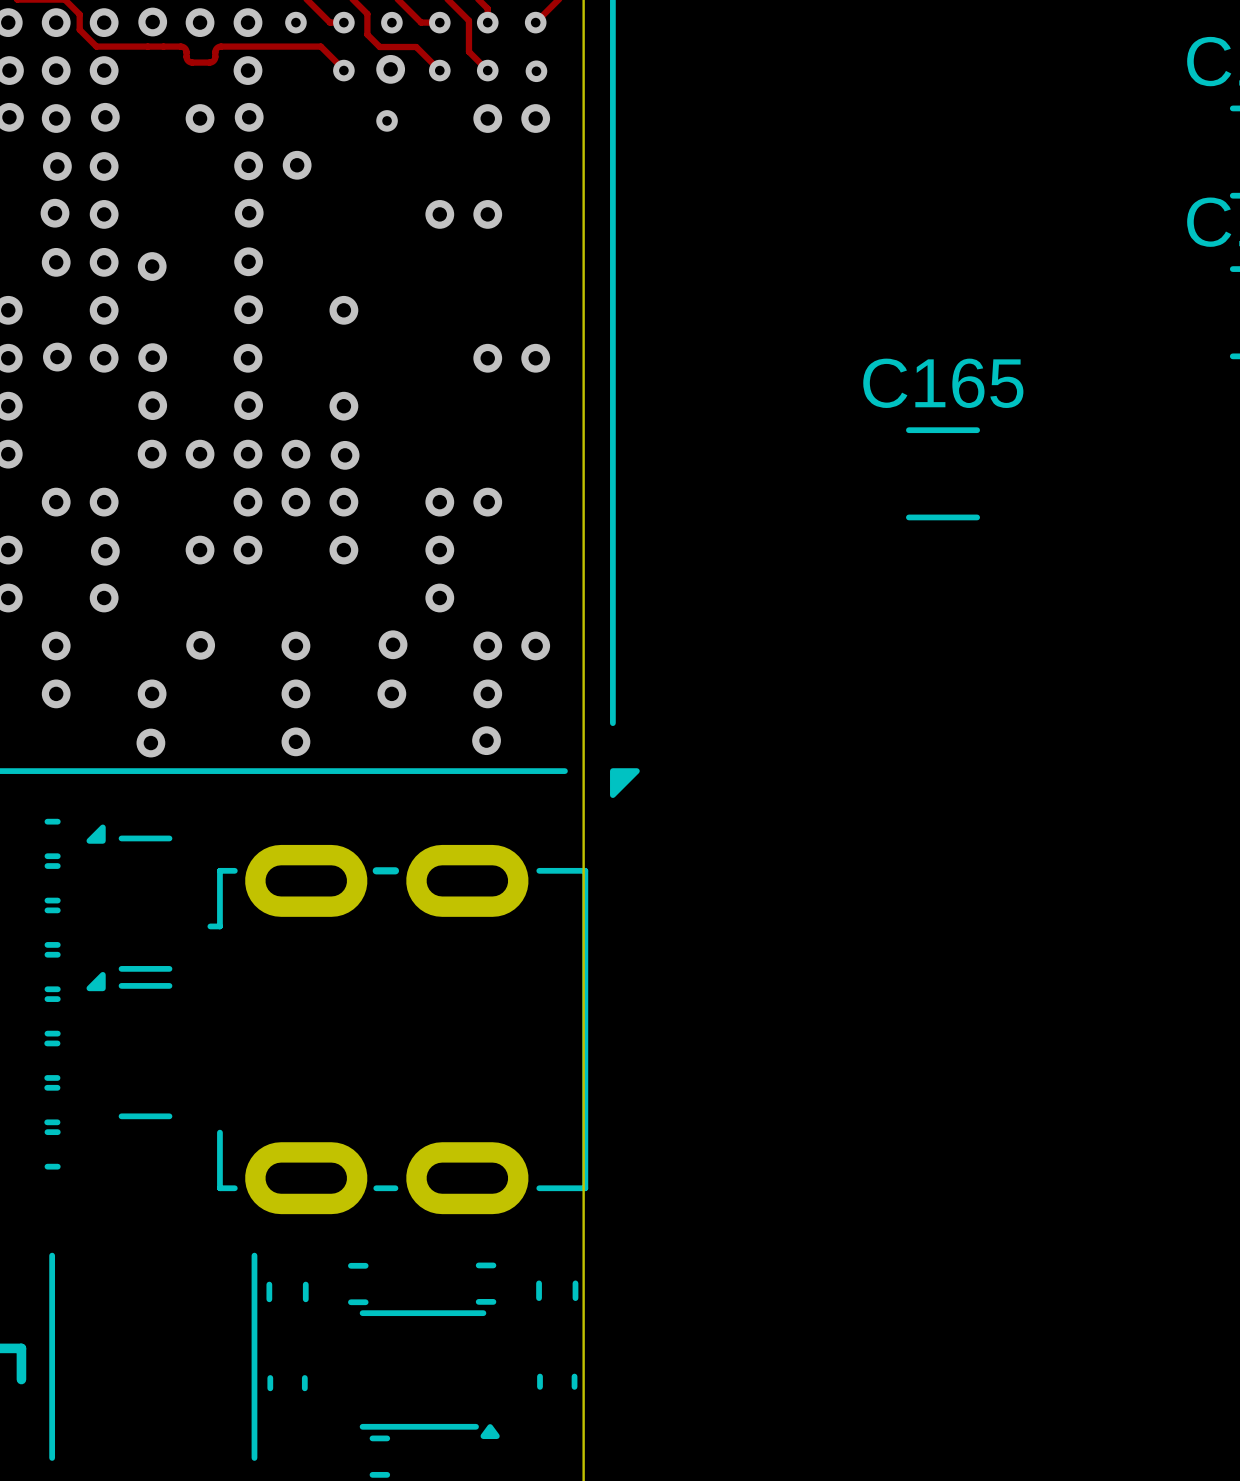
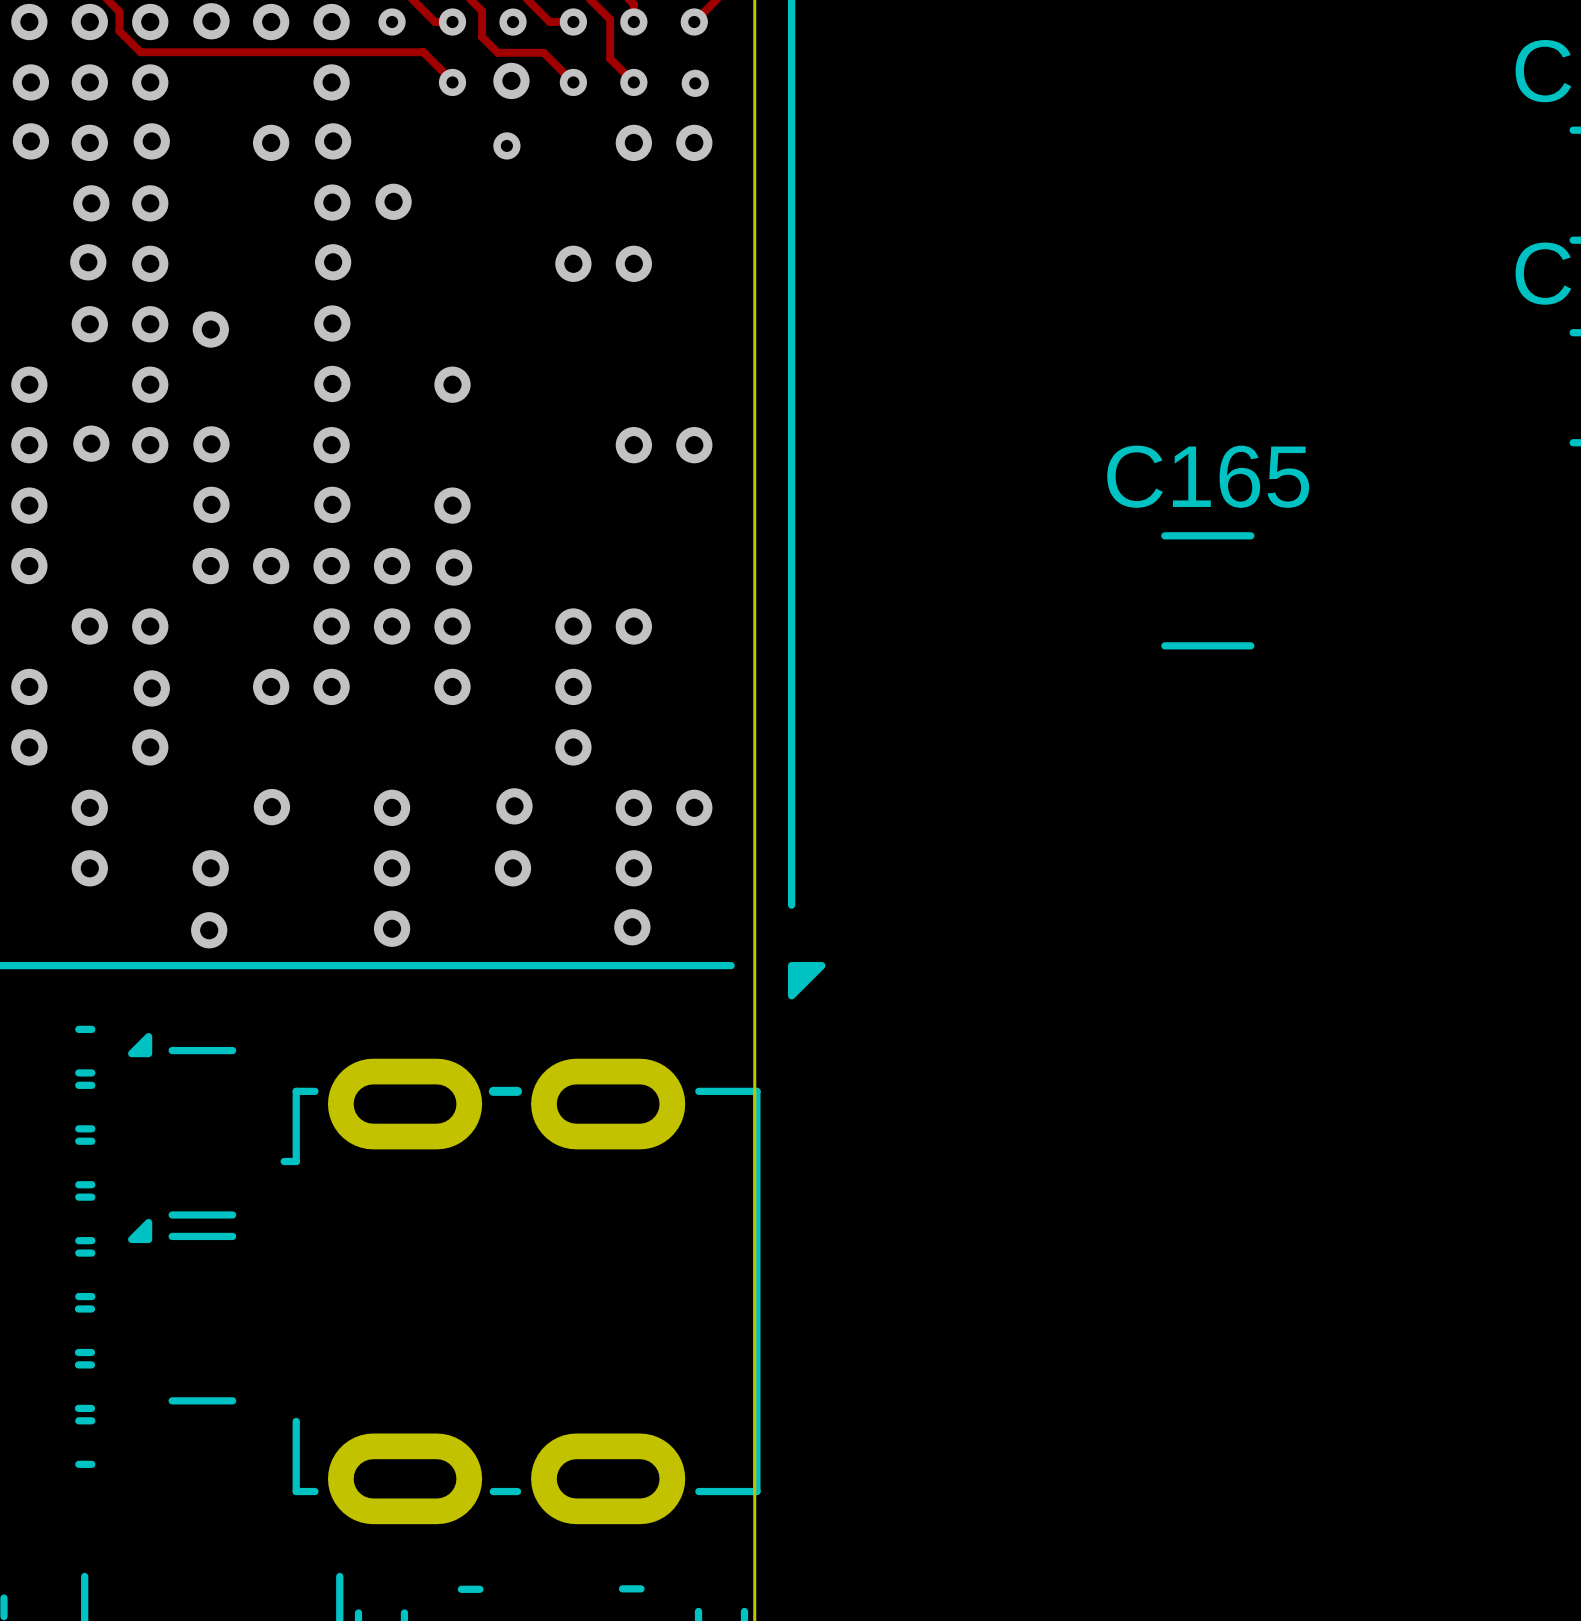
track: (180, 46) (185, 48) (187, 59) (192, 62) (212, 61) (216, 49) (221, 46) -> (246, 52) (297, 52)

